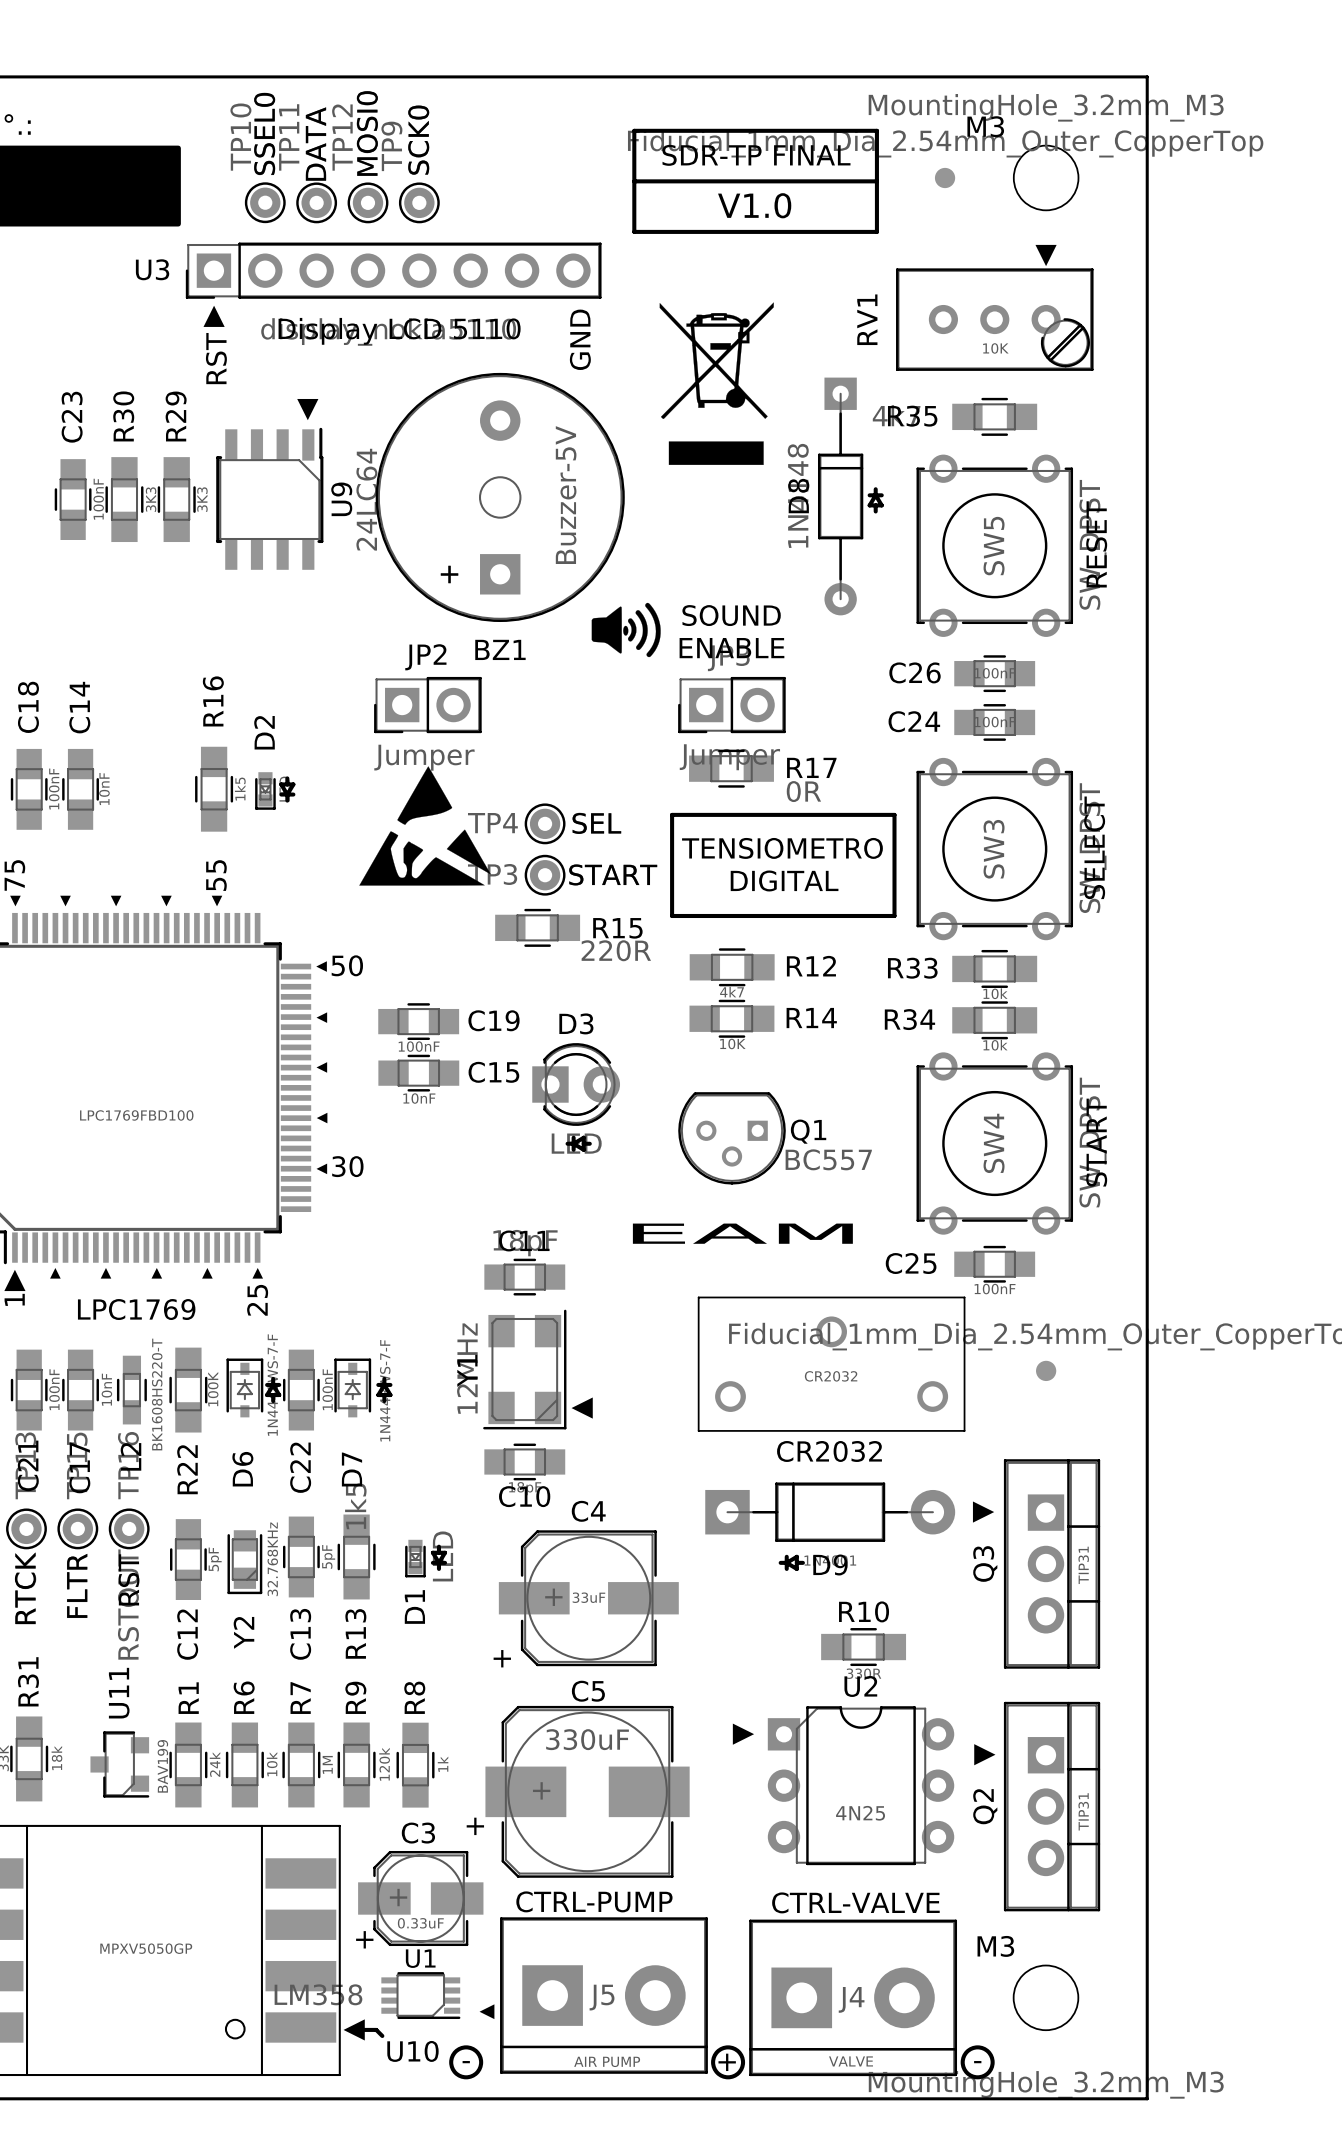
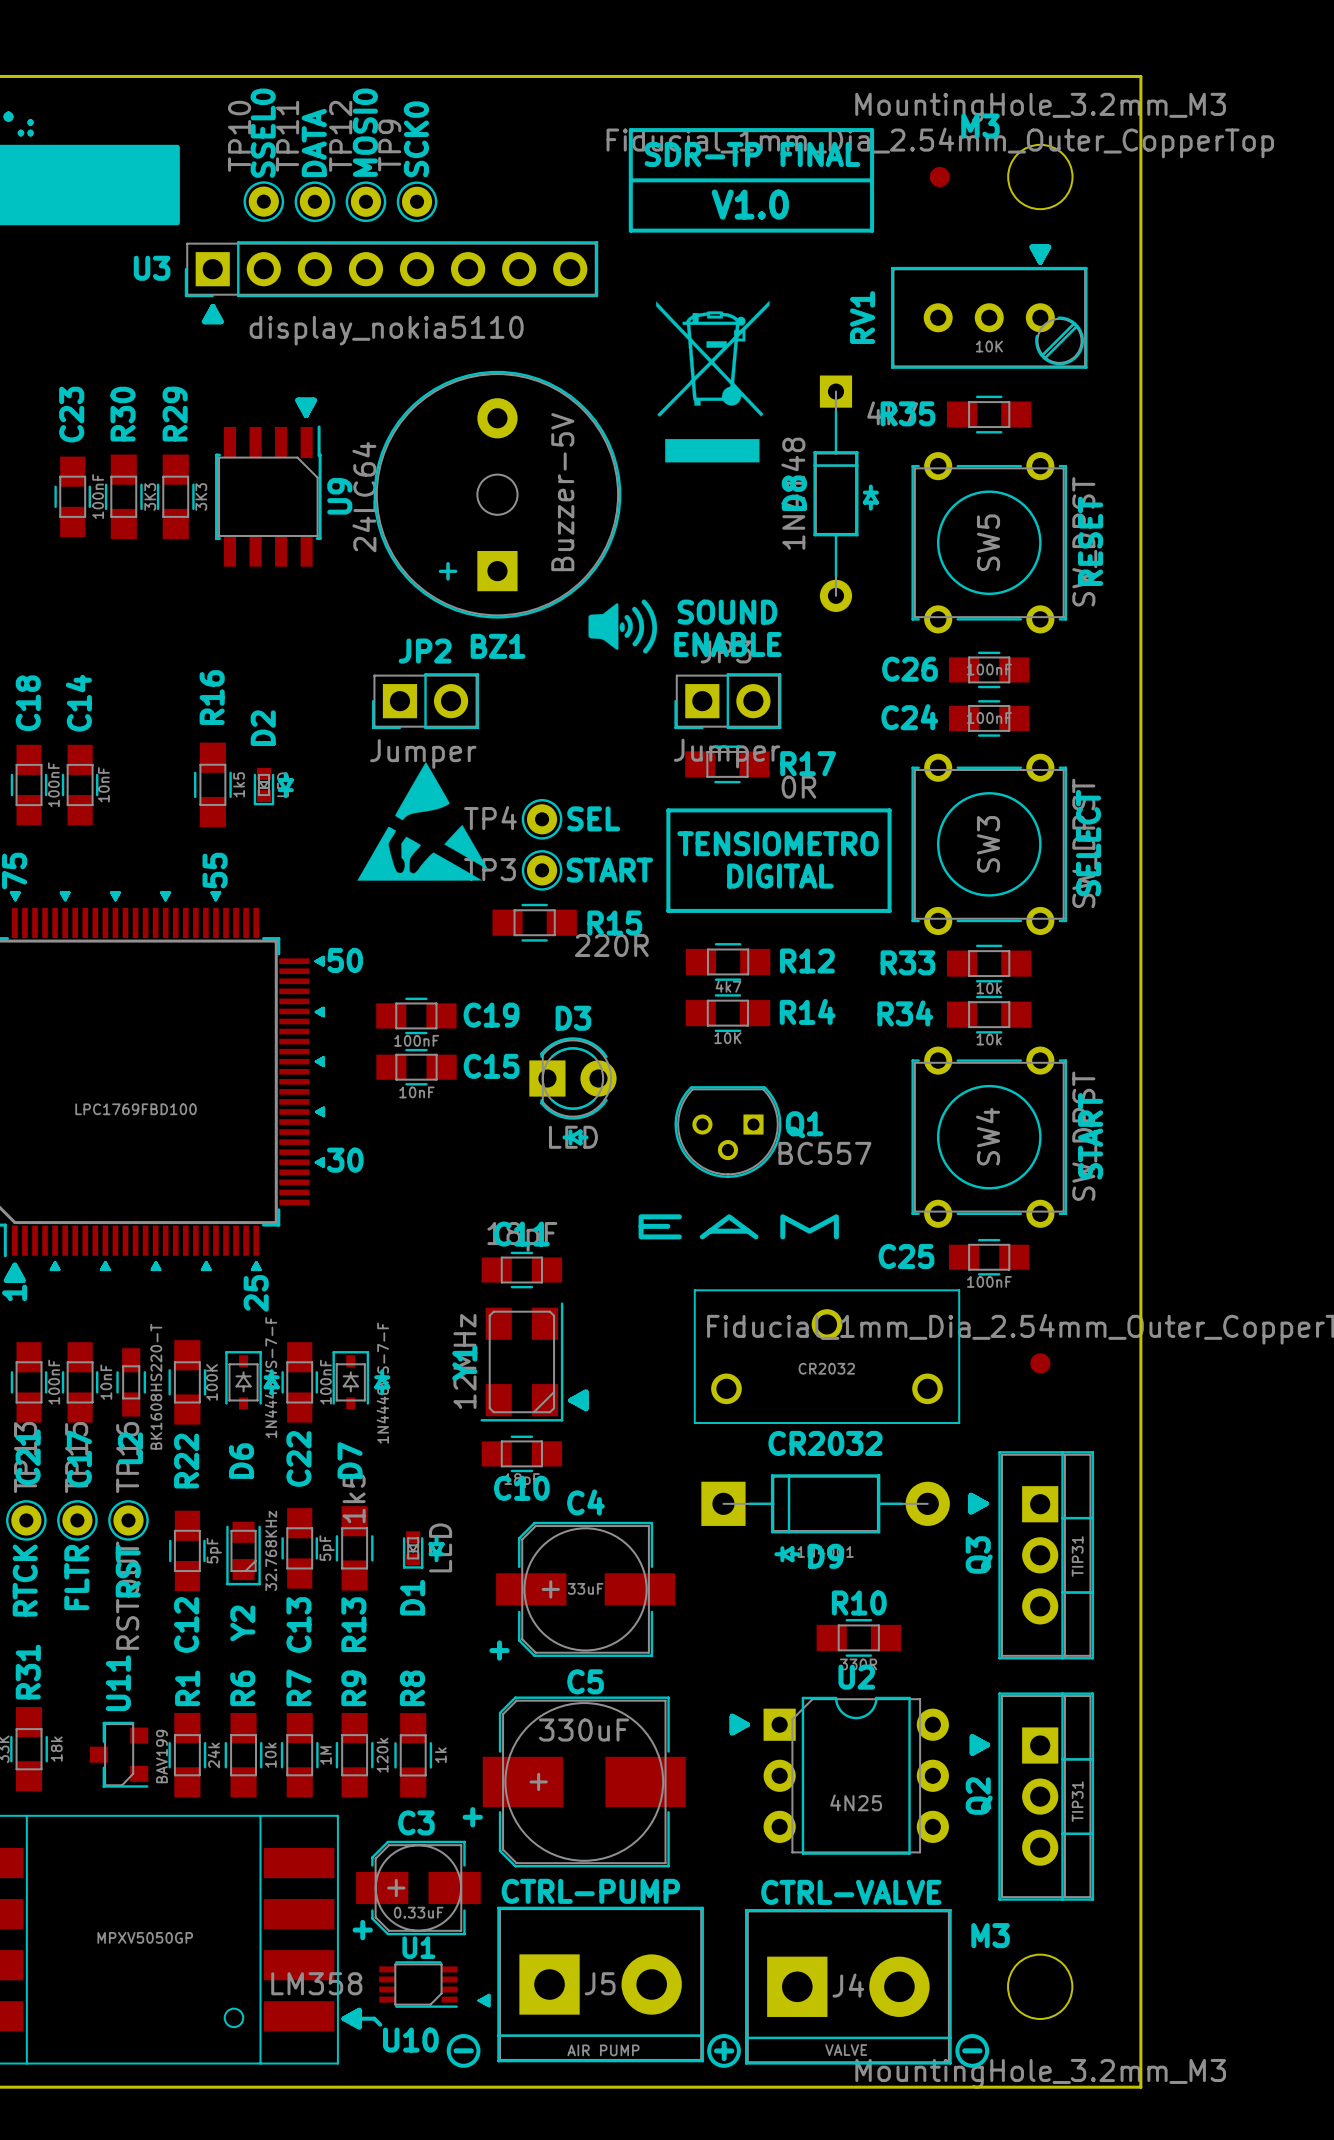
text: Display LCD 5110 (399, 331) -> none
text: GND (580, 339) -> none
text: RST (216, 358) -> none
text: LPC1769 (136, 1309) -> none

